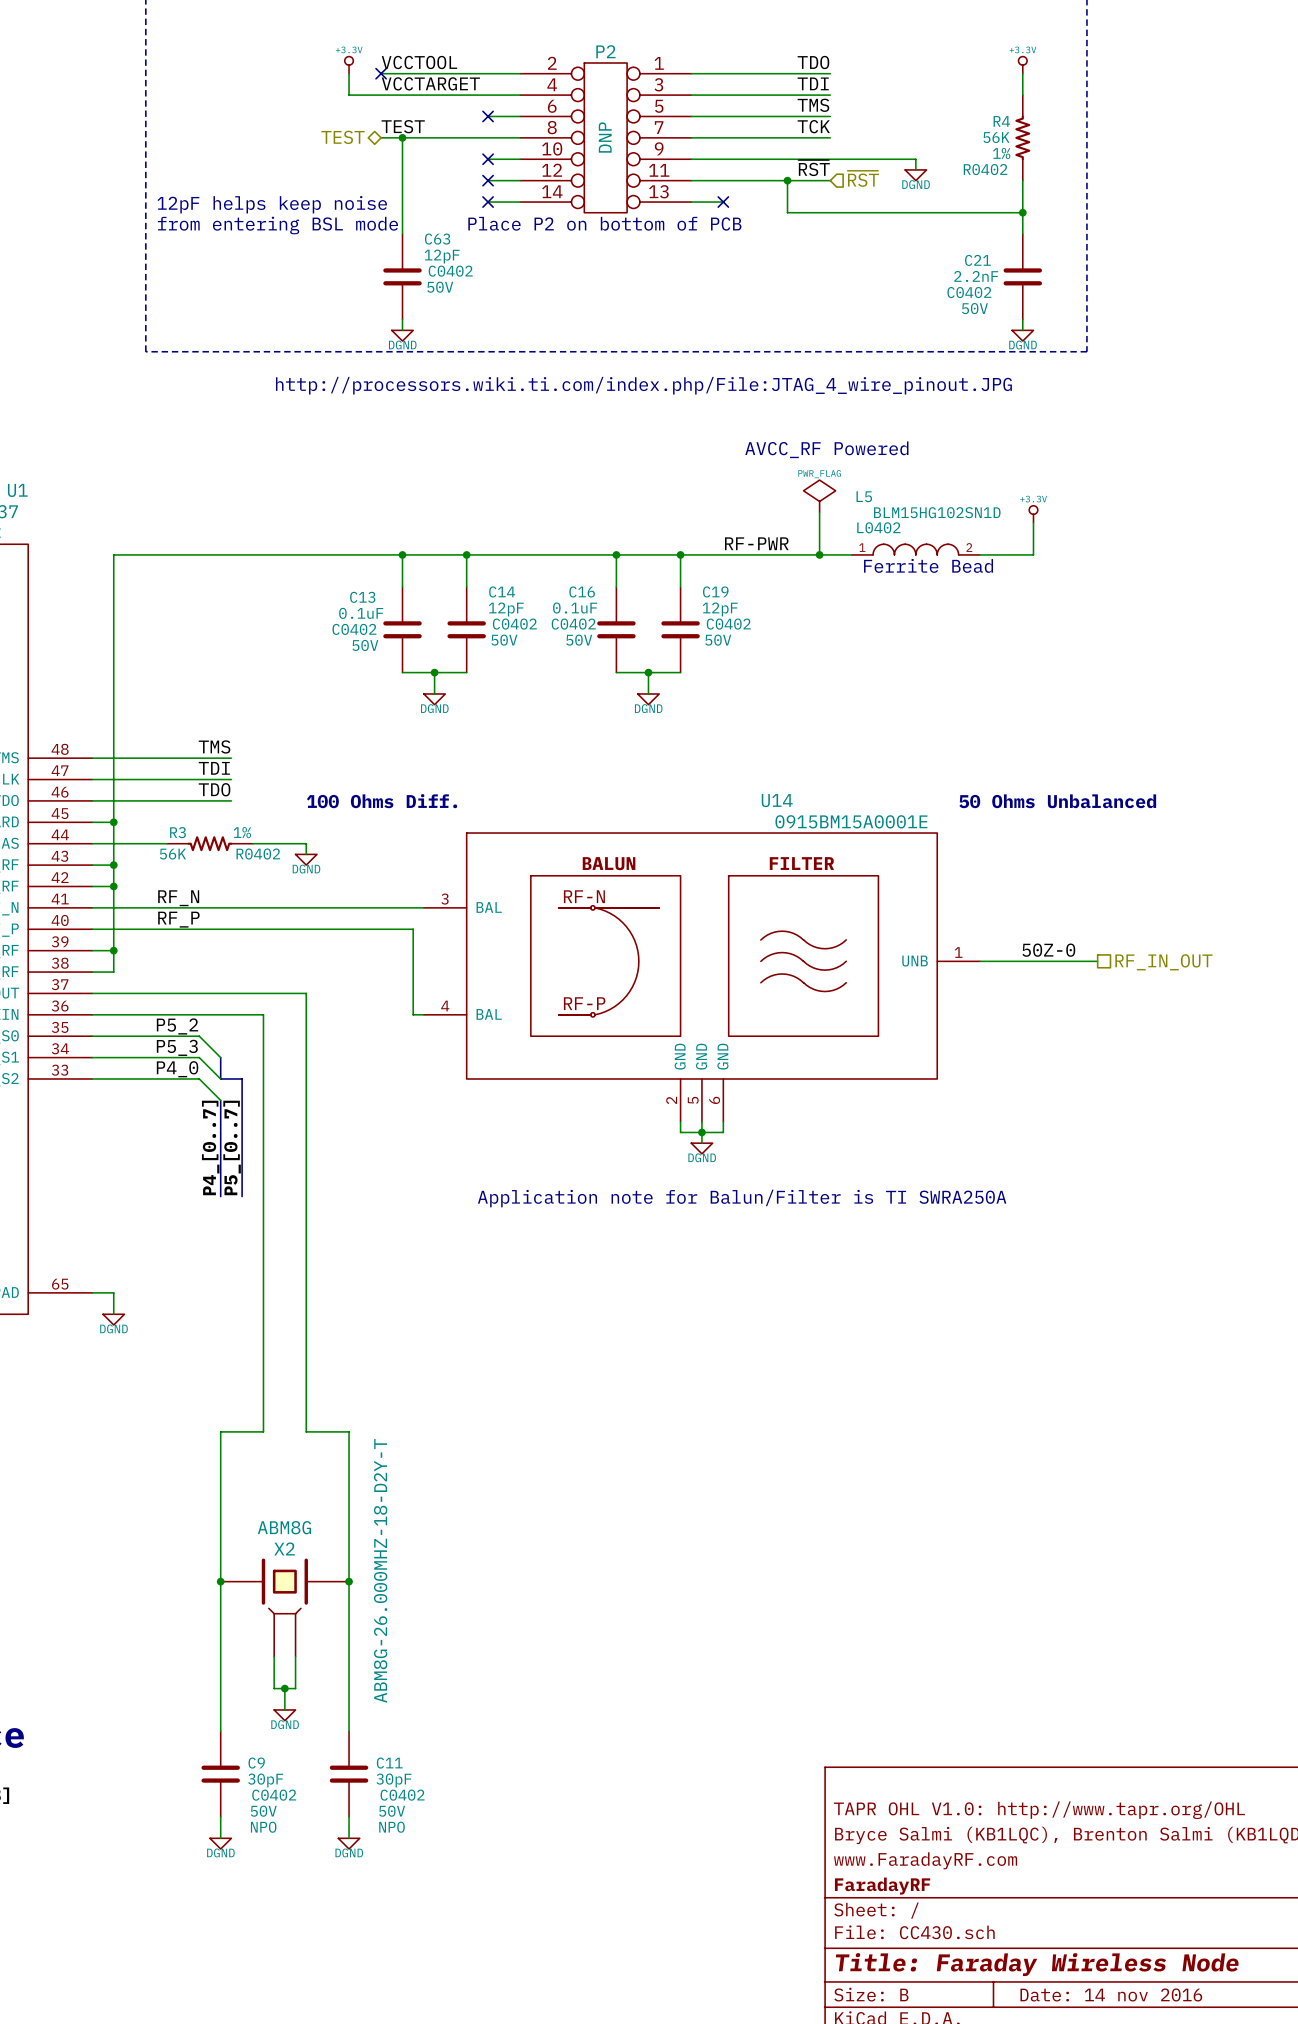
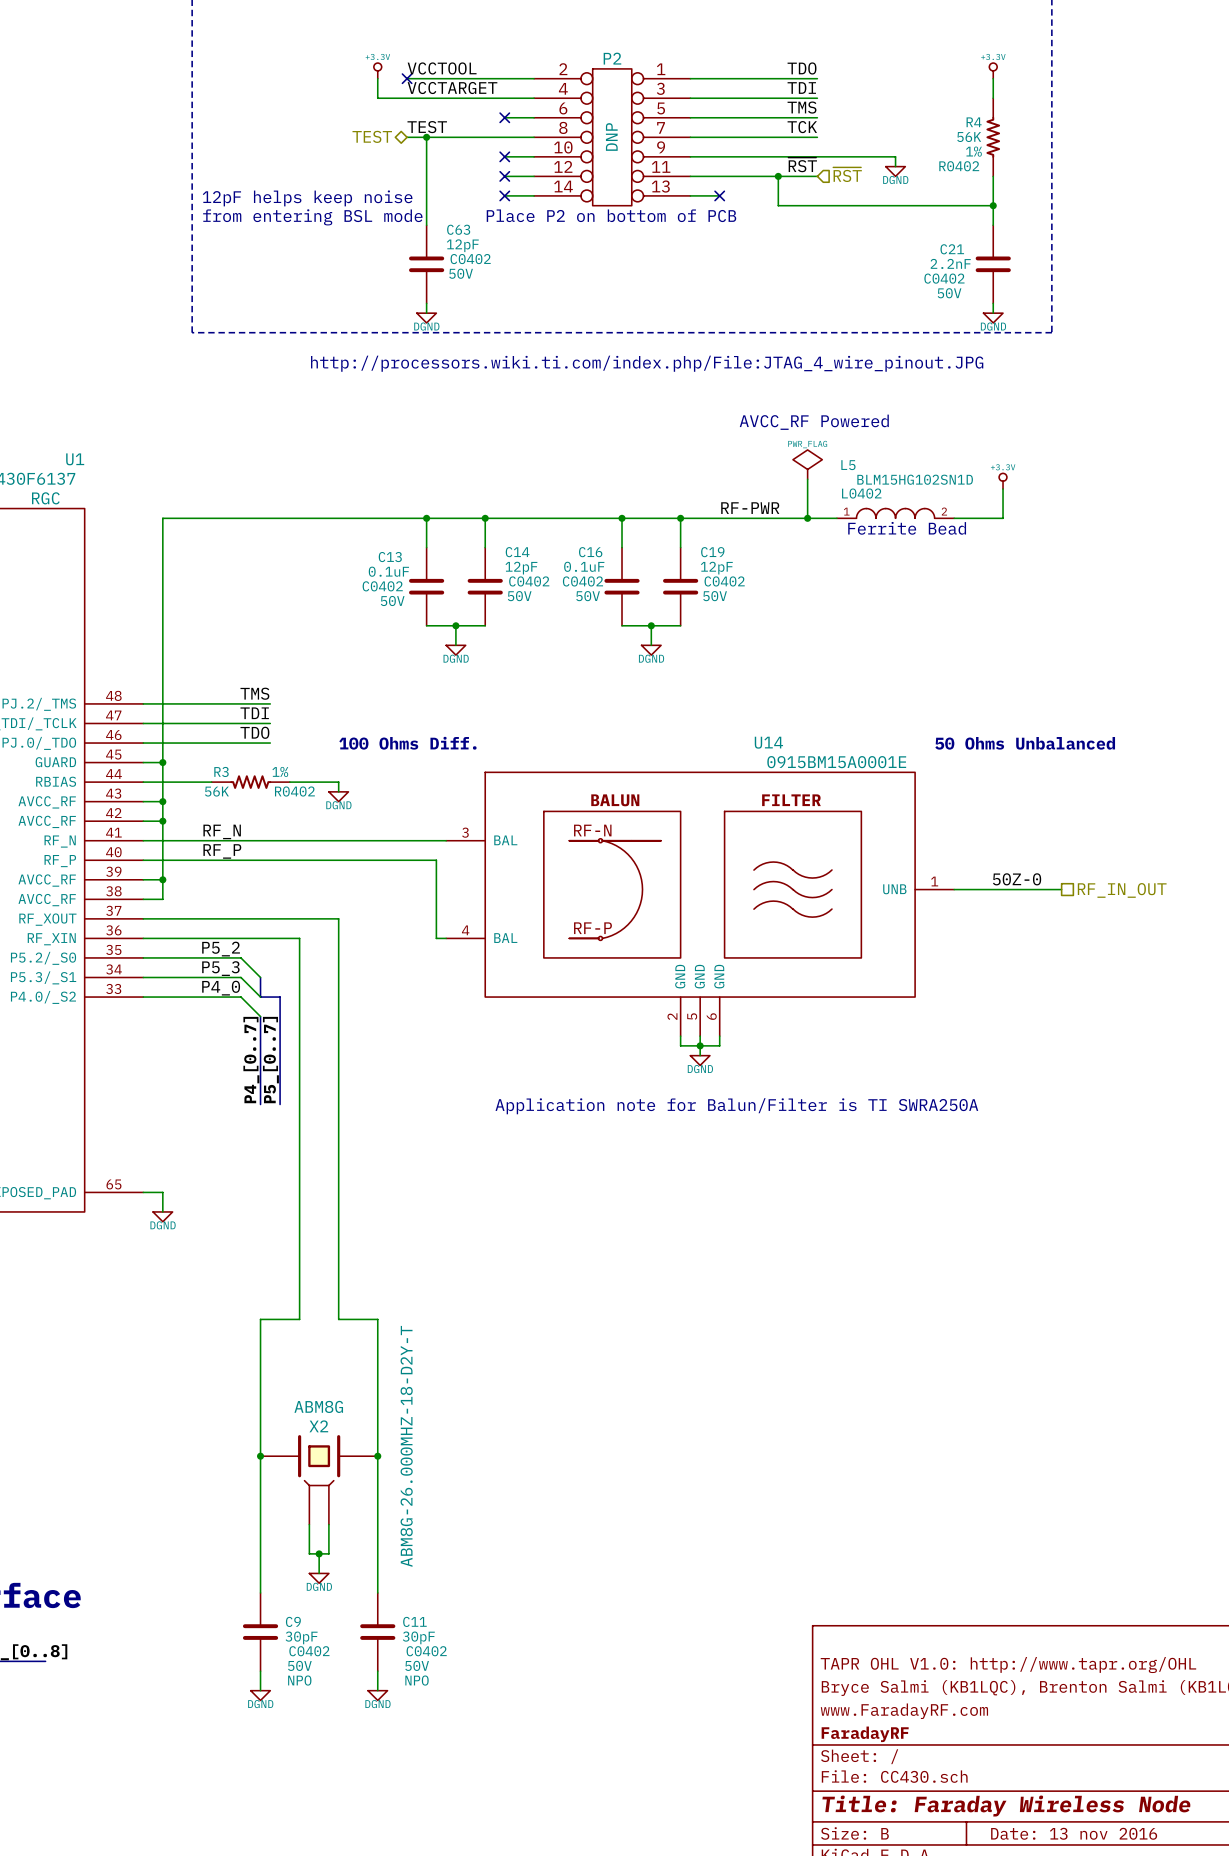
title block: Date: 14 nov 2016 (1111, 1994) -> Date: 13 nov 2016 (1074, 1833)

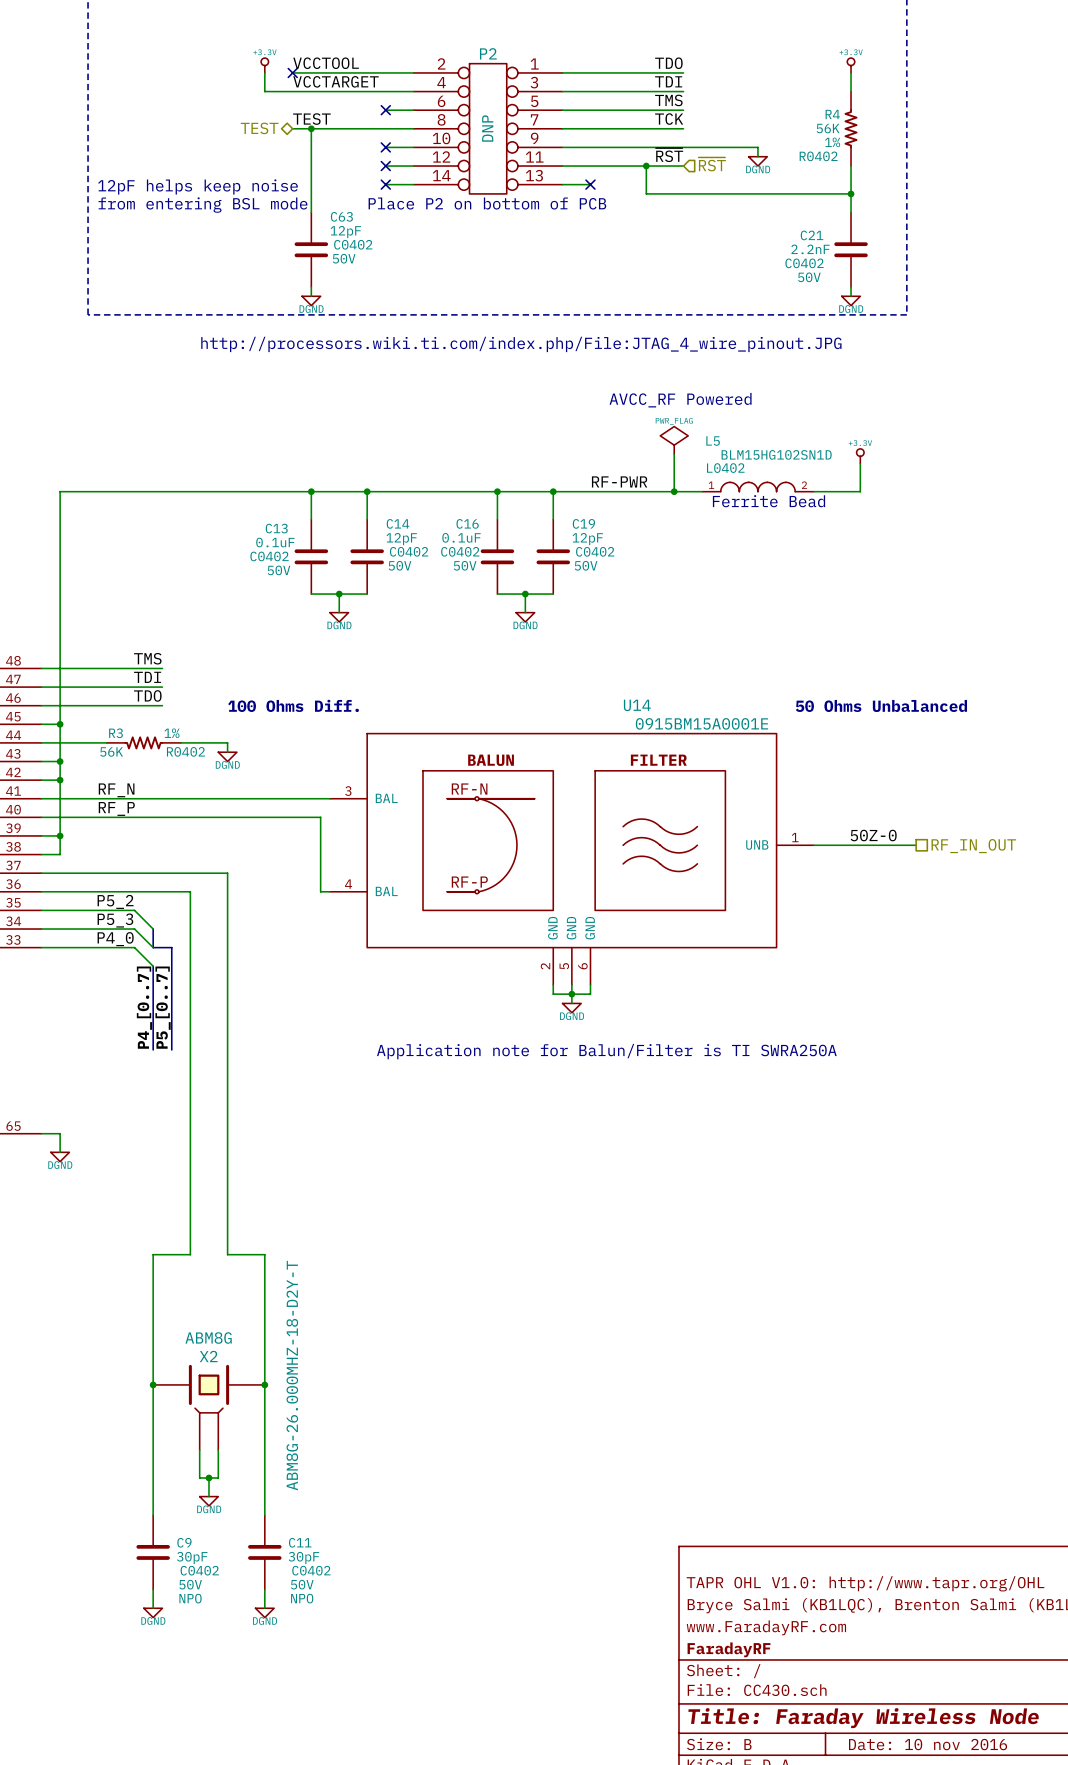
title block: Date: 13 nov 2016 (1074, 1833) -> Date: 10 nov 2016 (928, 1744)

